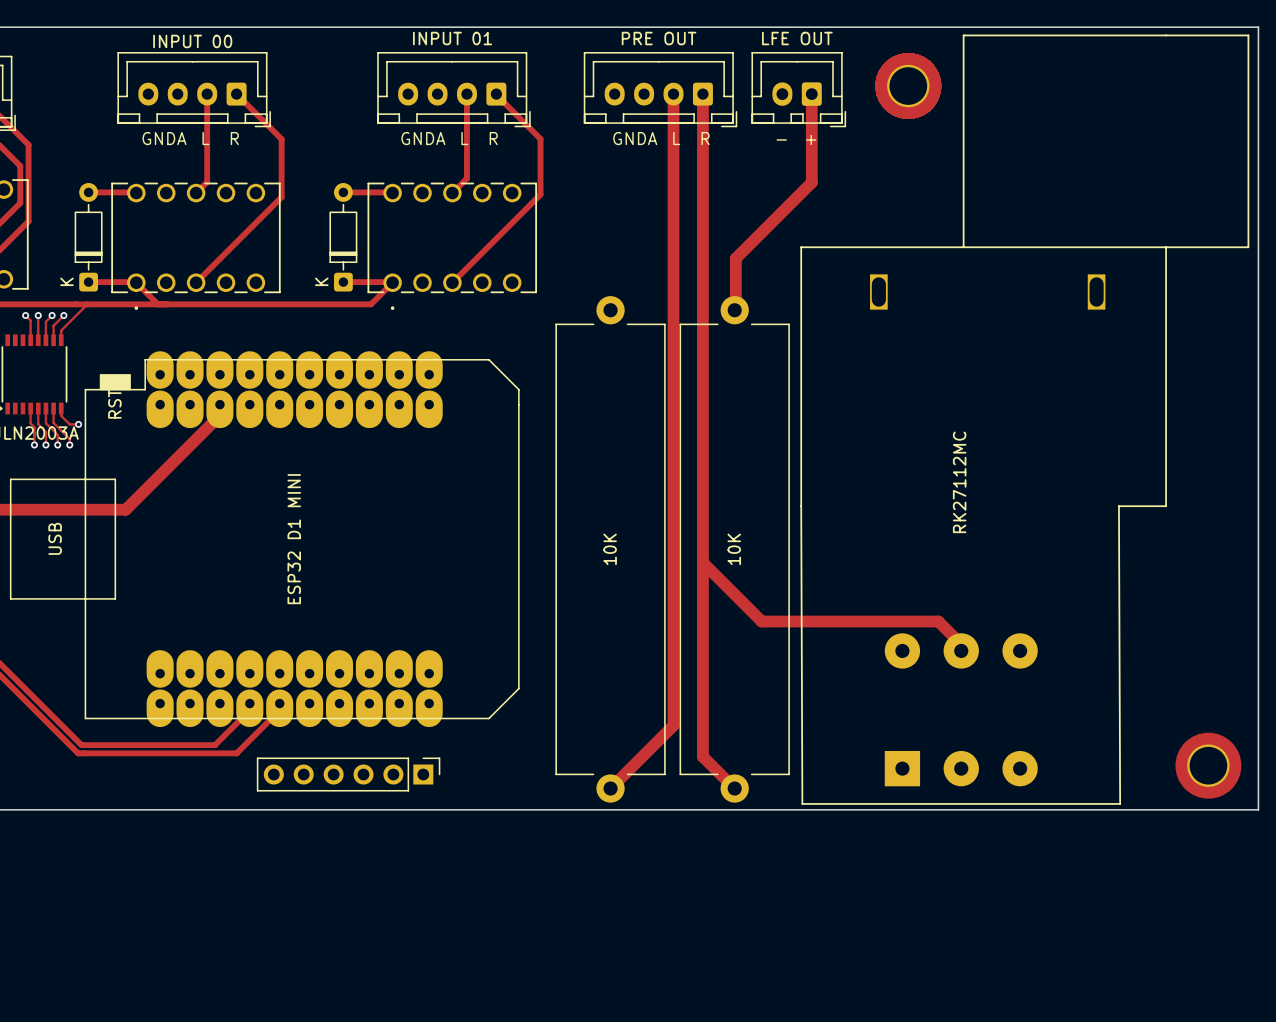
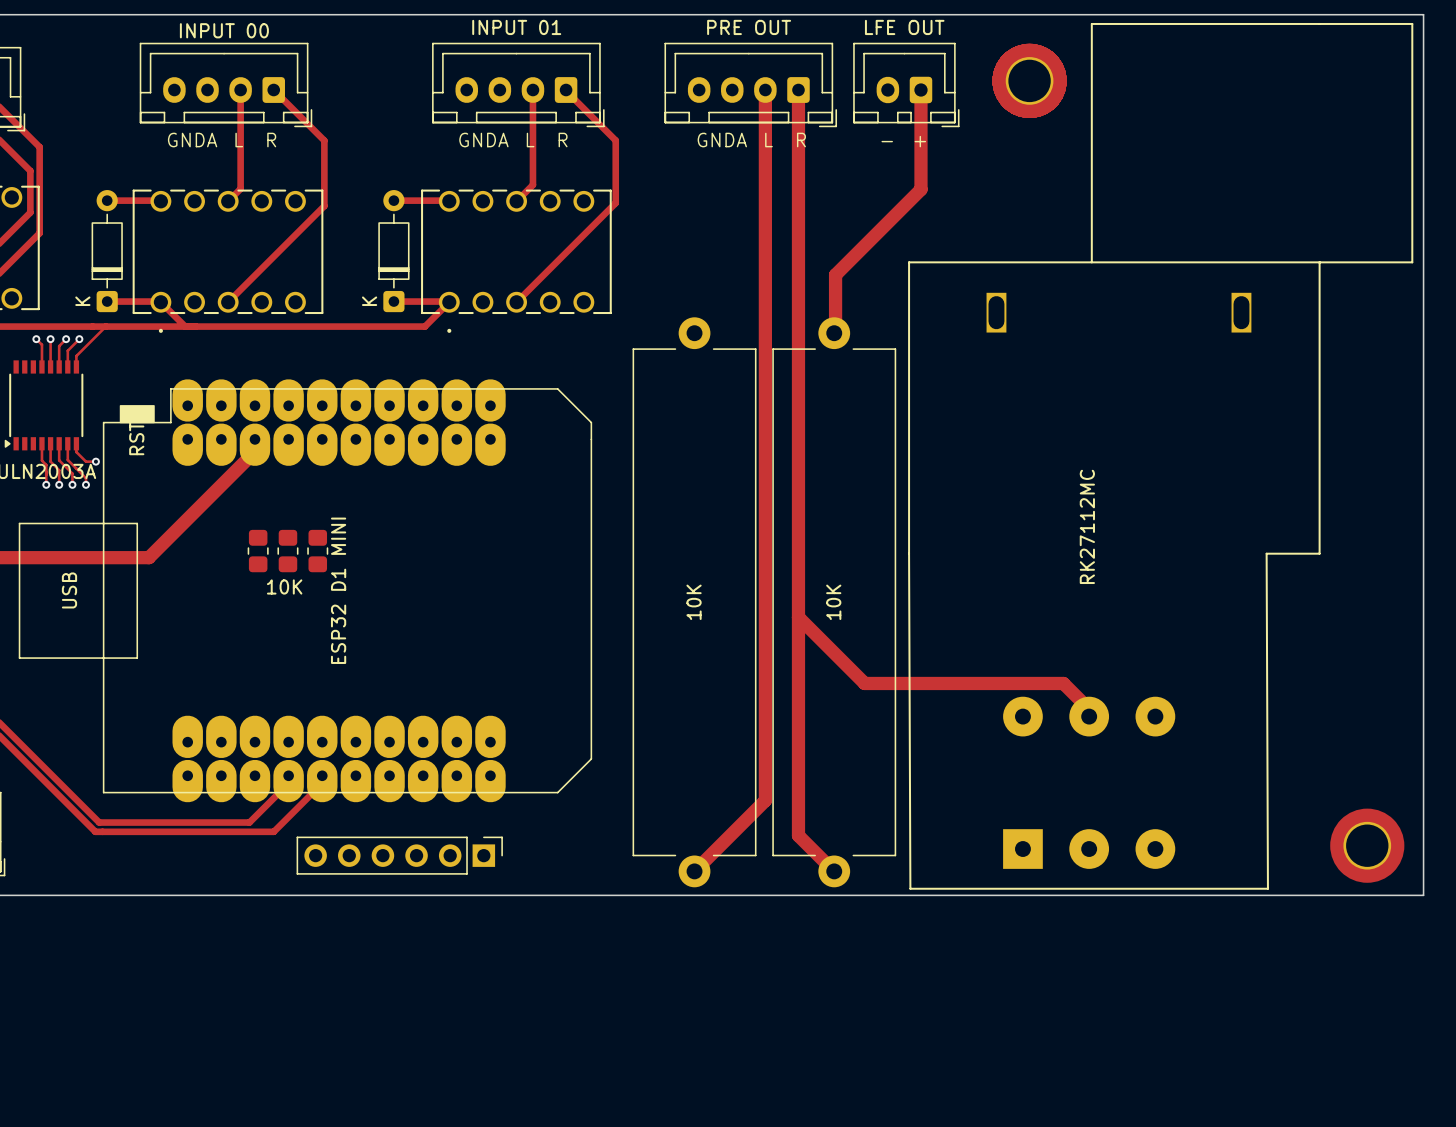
part: none -> 10K (258, 551)
part: none -> (287, 551)
part: none -> (317, 551)

